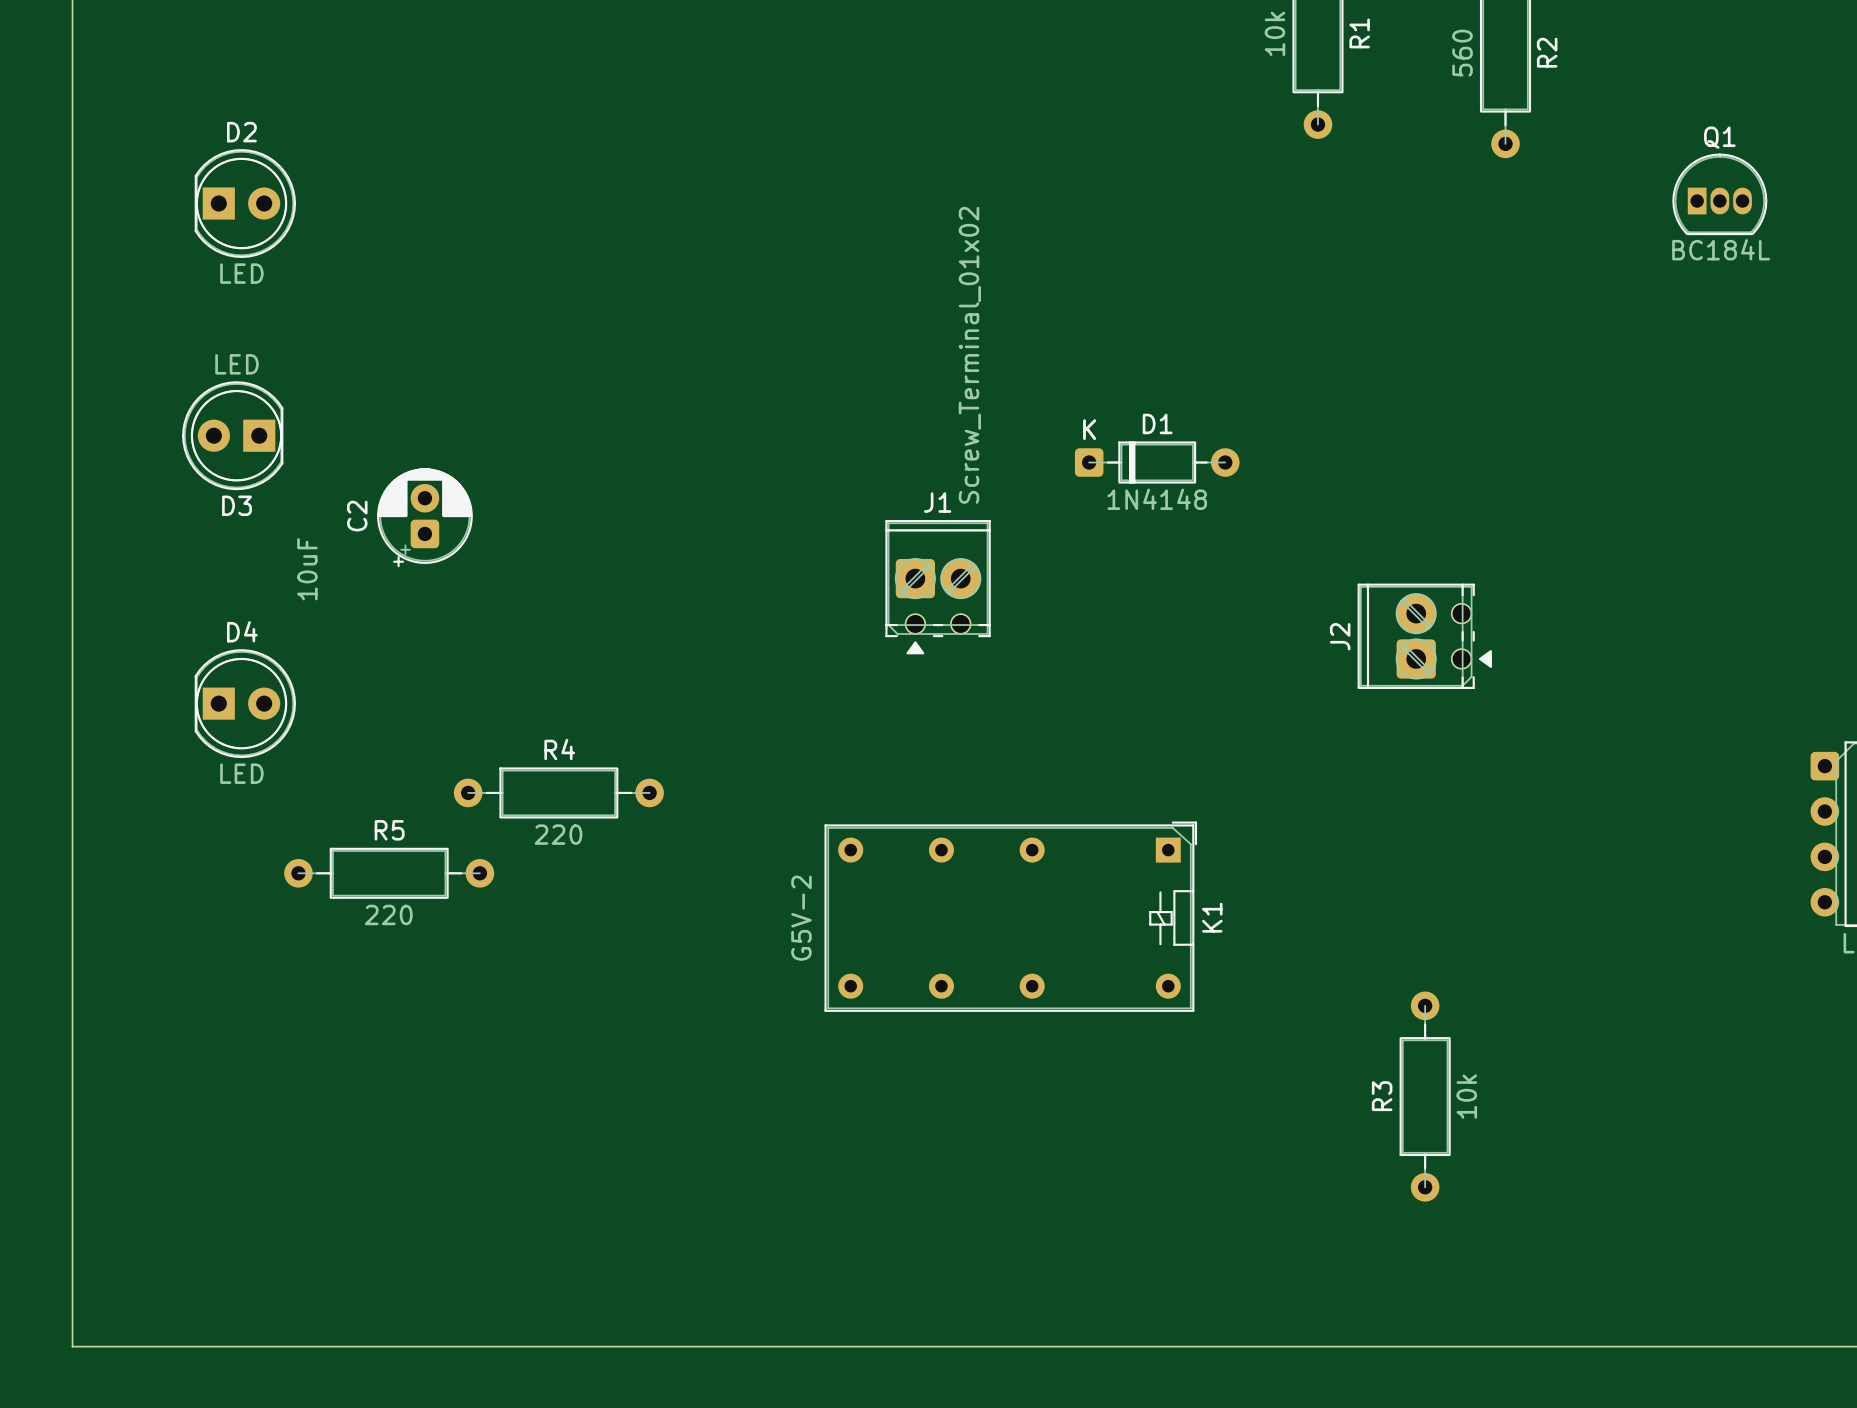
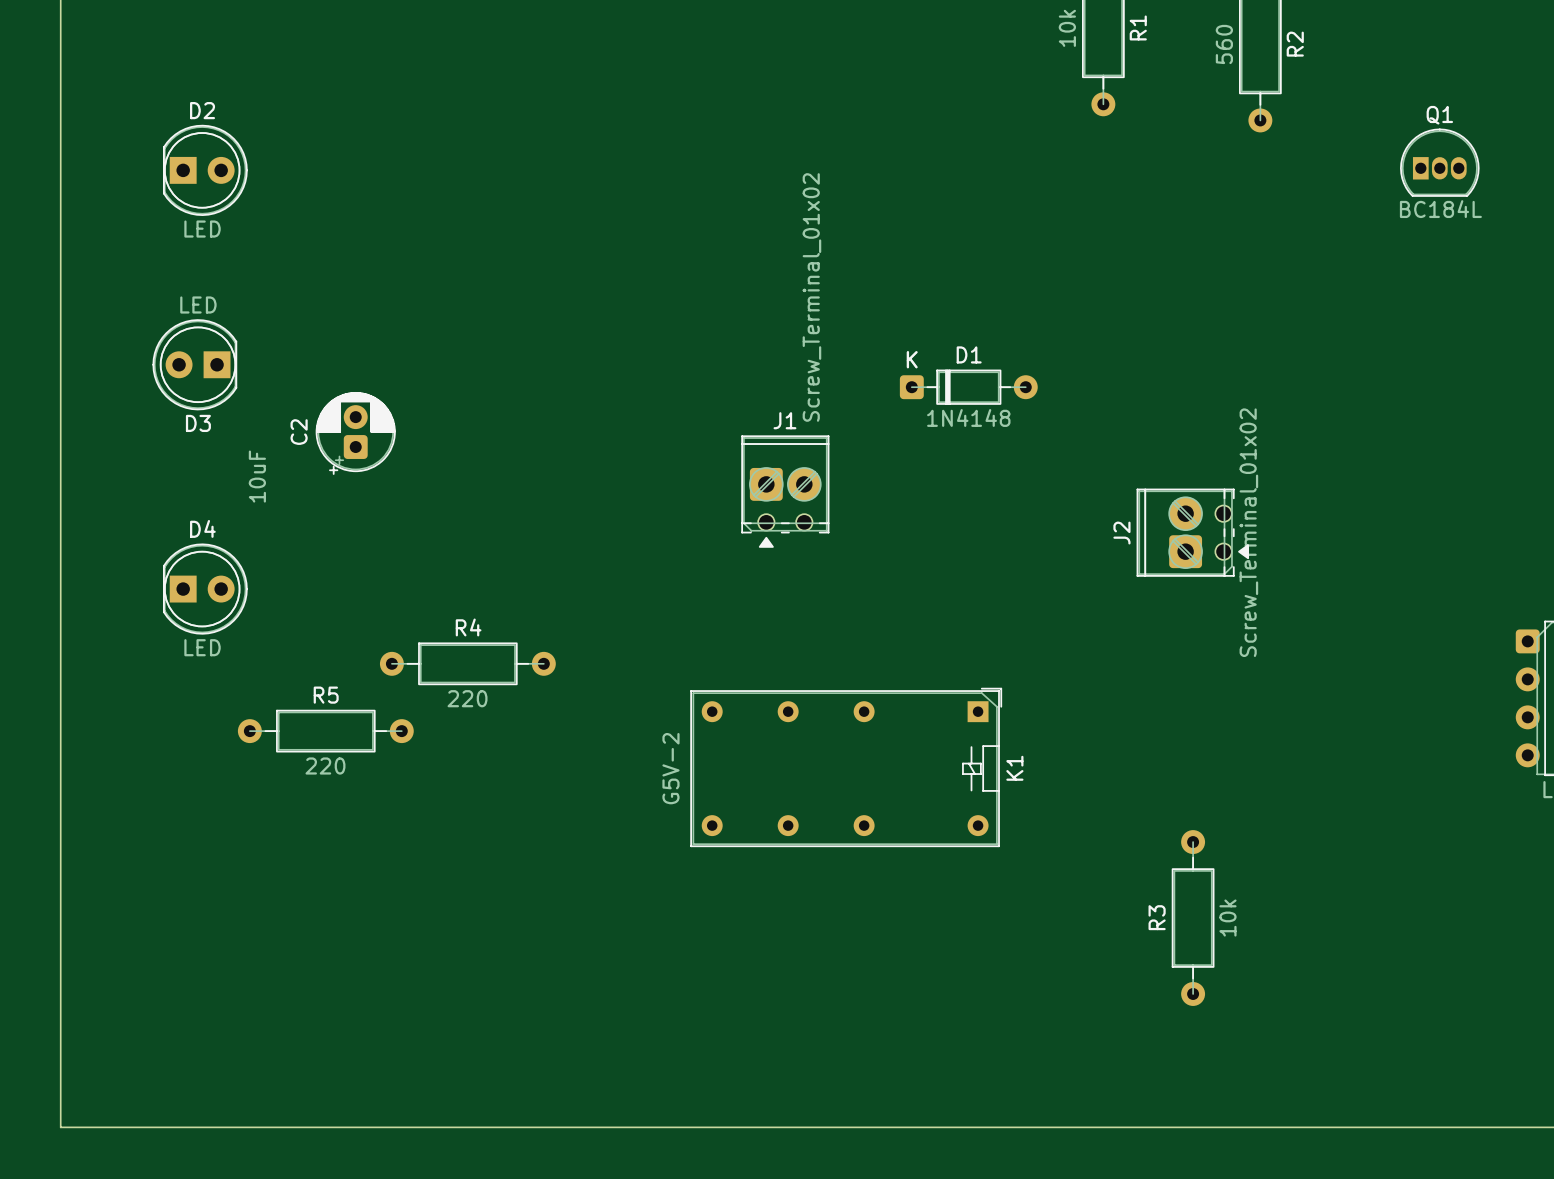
J2 value: none -> Screw_Terminal_01x02 (1248, 532)

